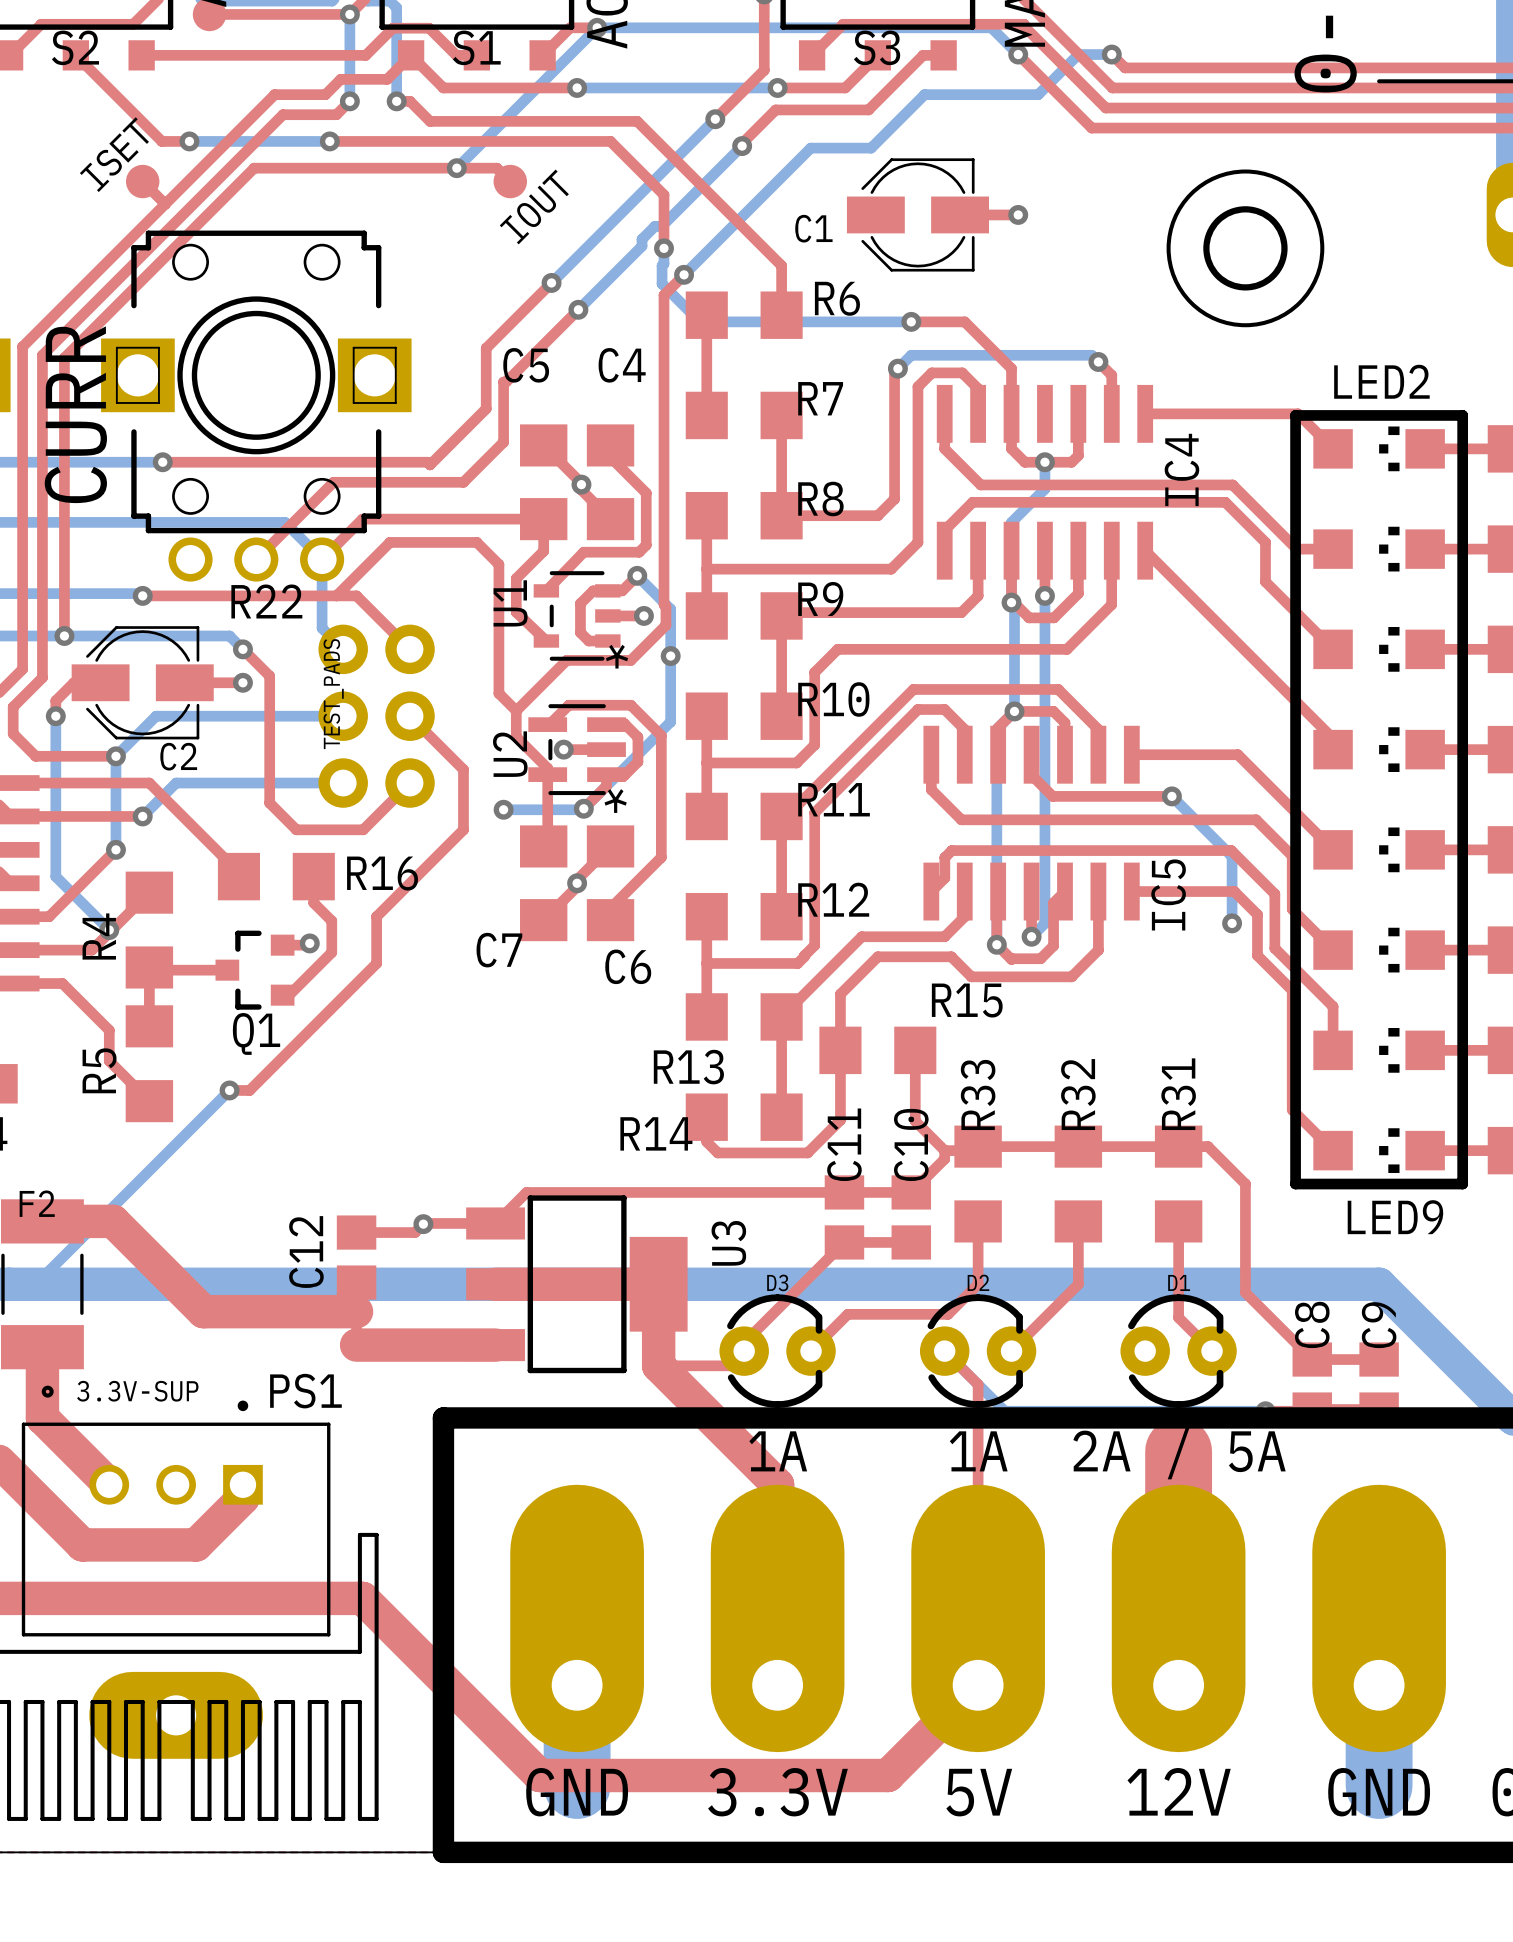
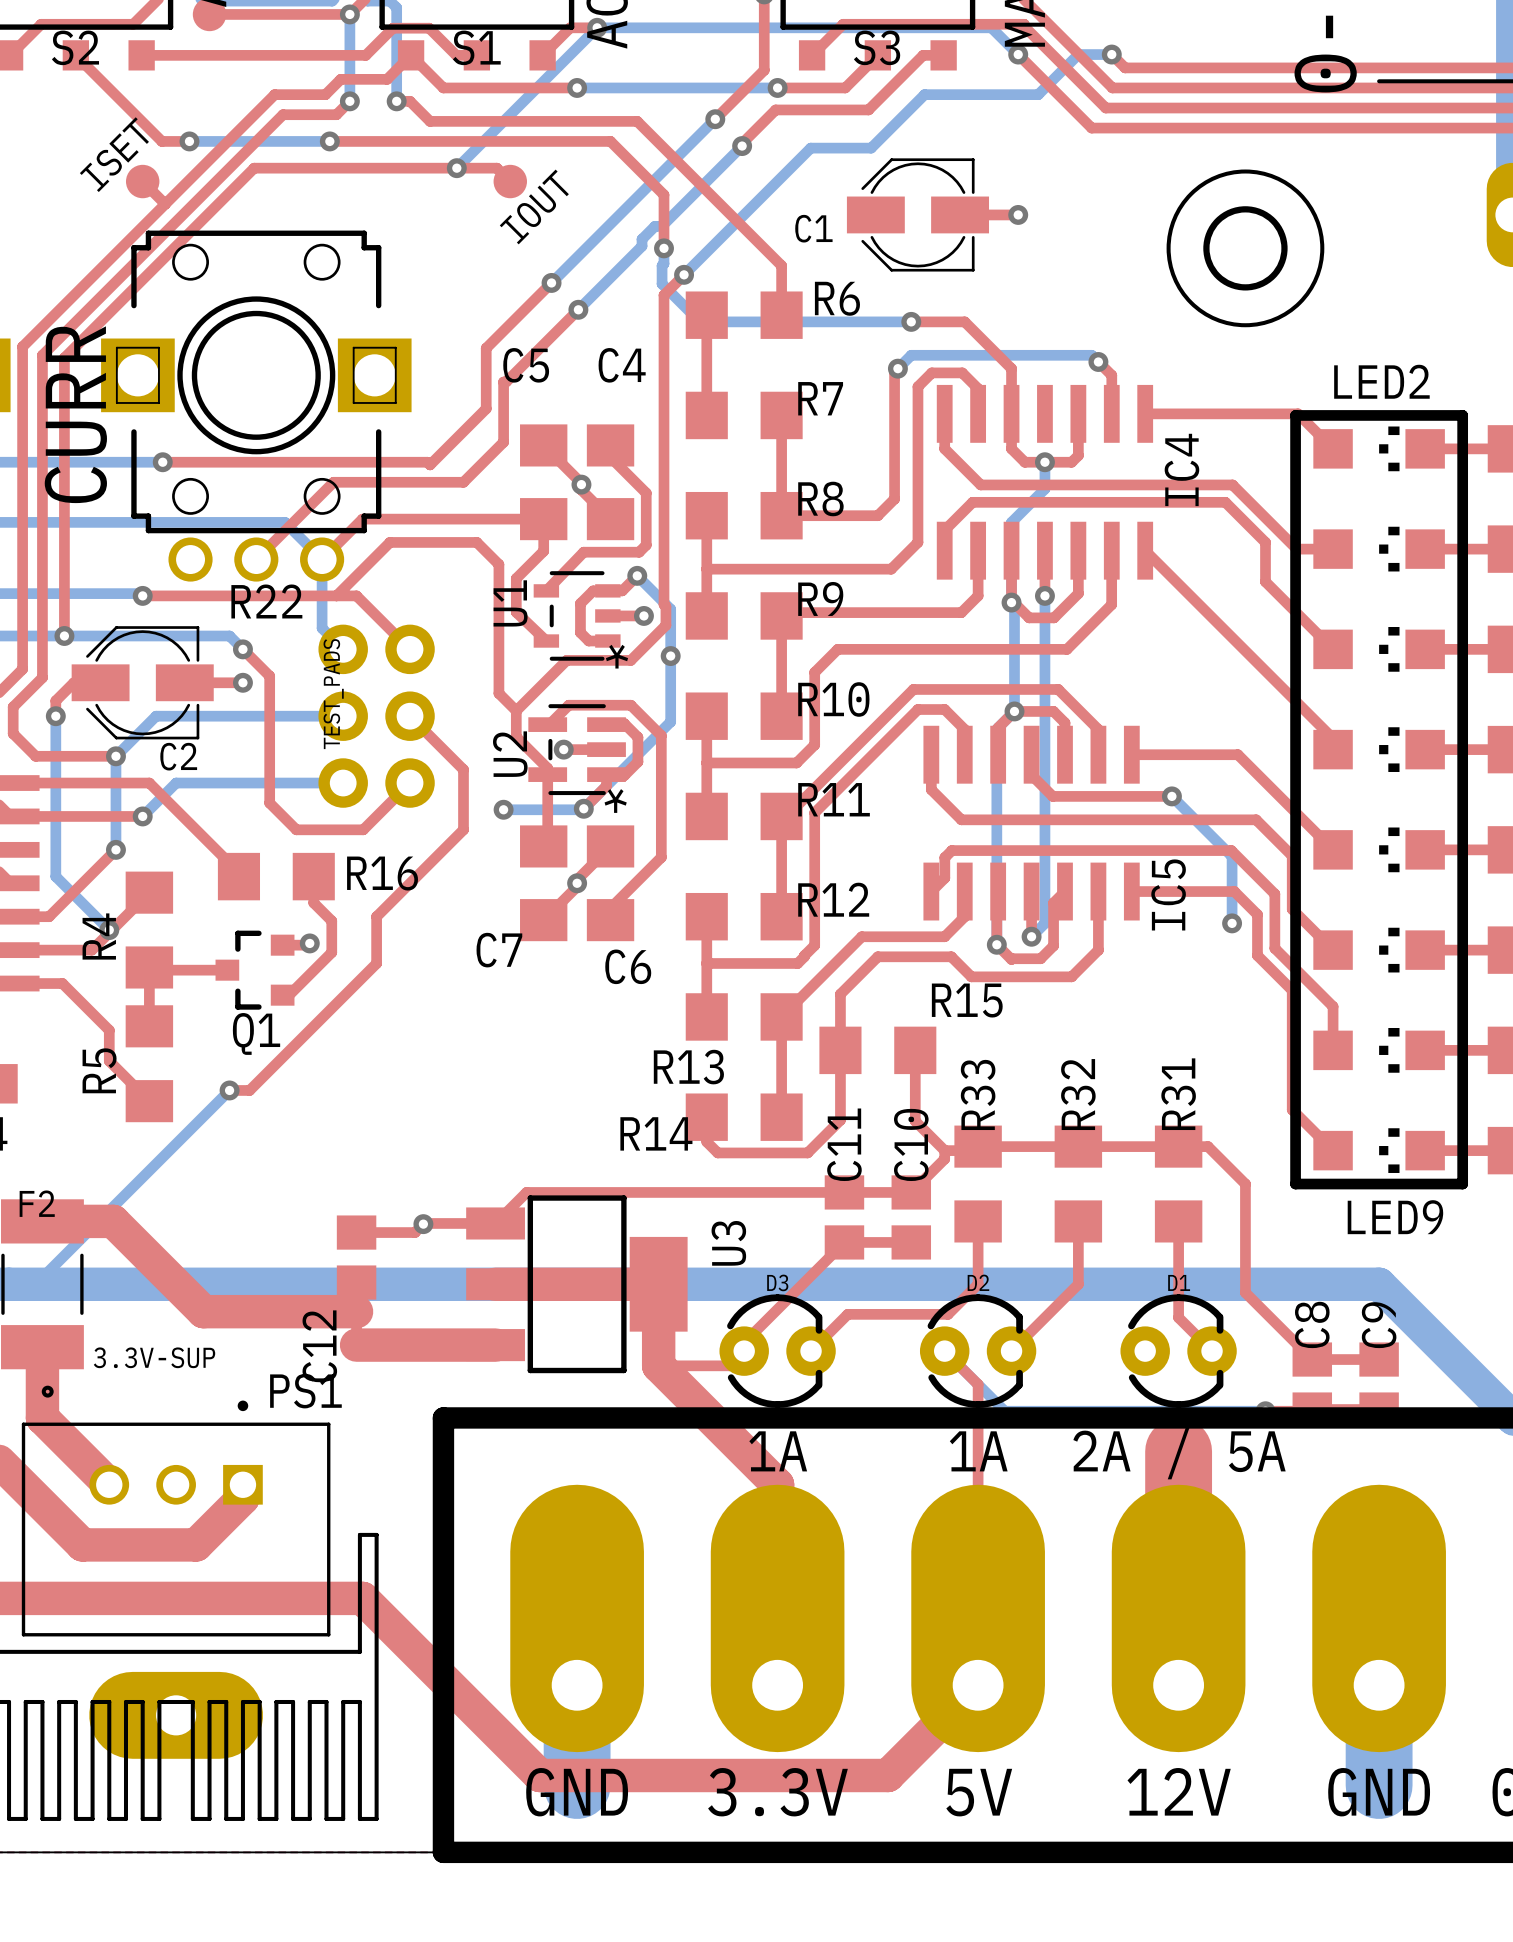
C12 name position: C12 (306, 1252) -> C12 (319, 1346)
text position: 3.3V-SUP (137, 1391) -> 3.3V-SUP (154, 1357)

